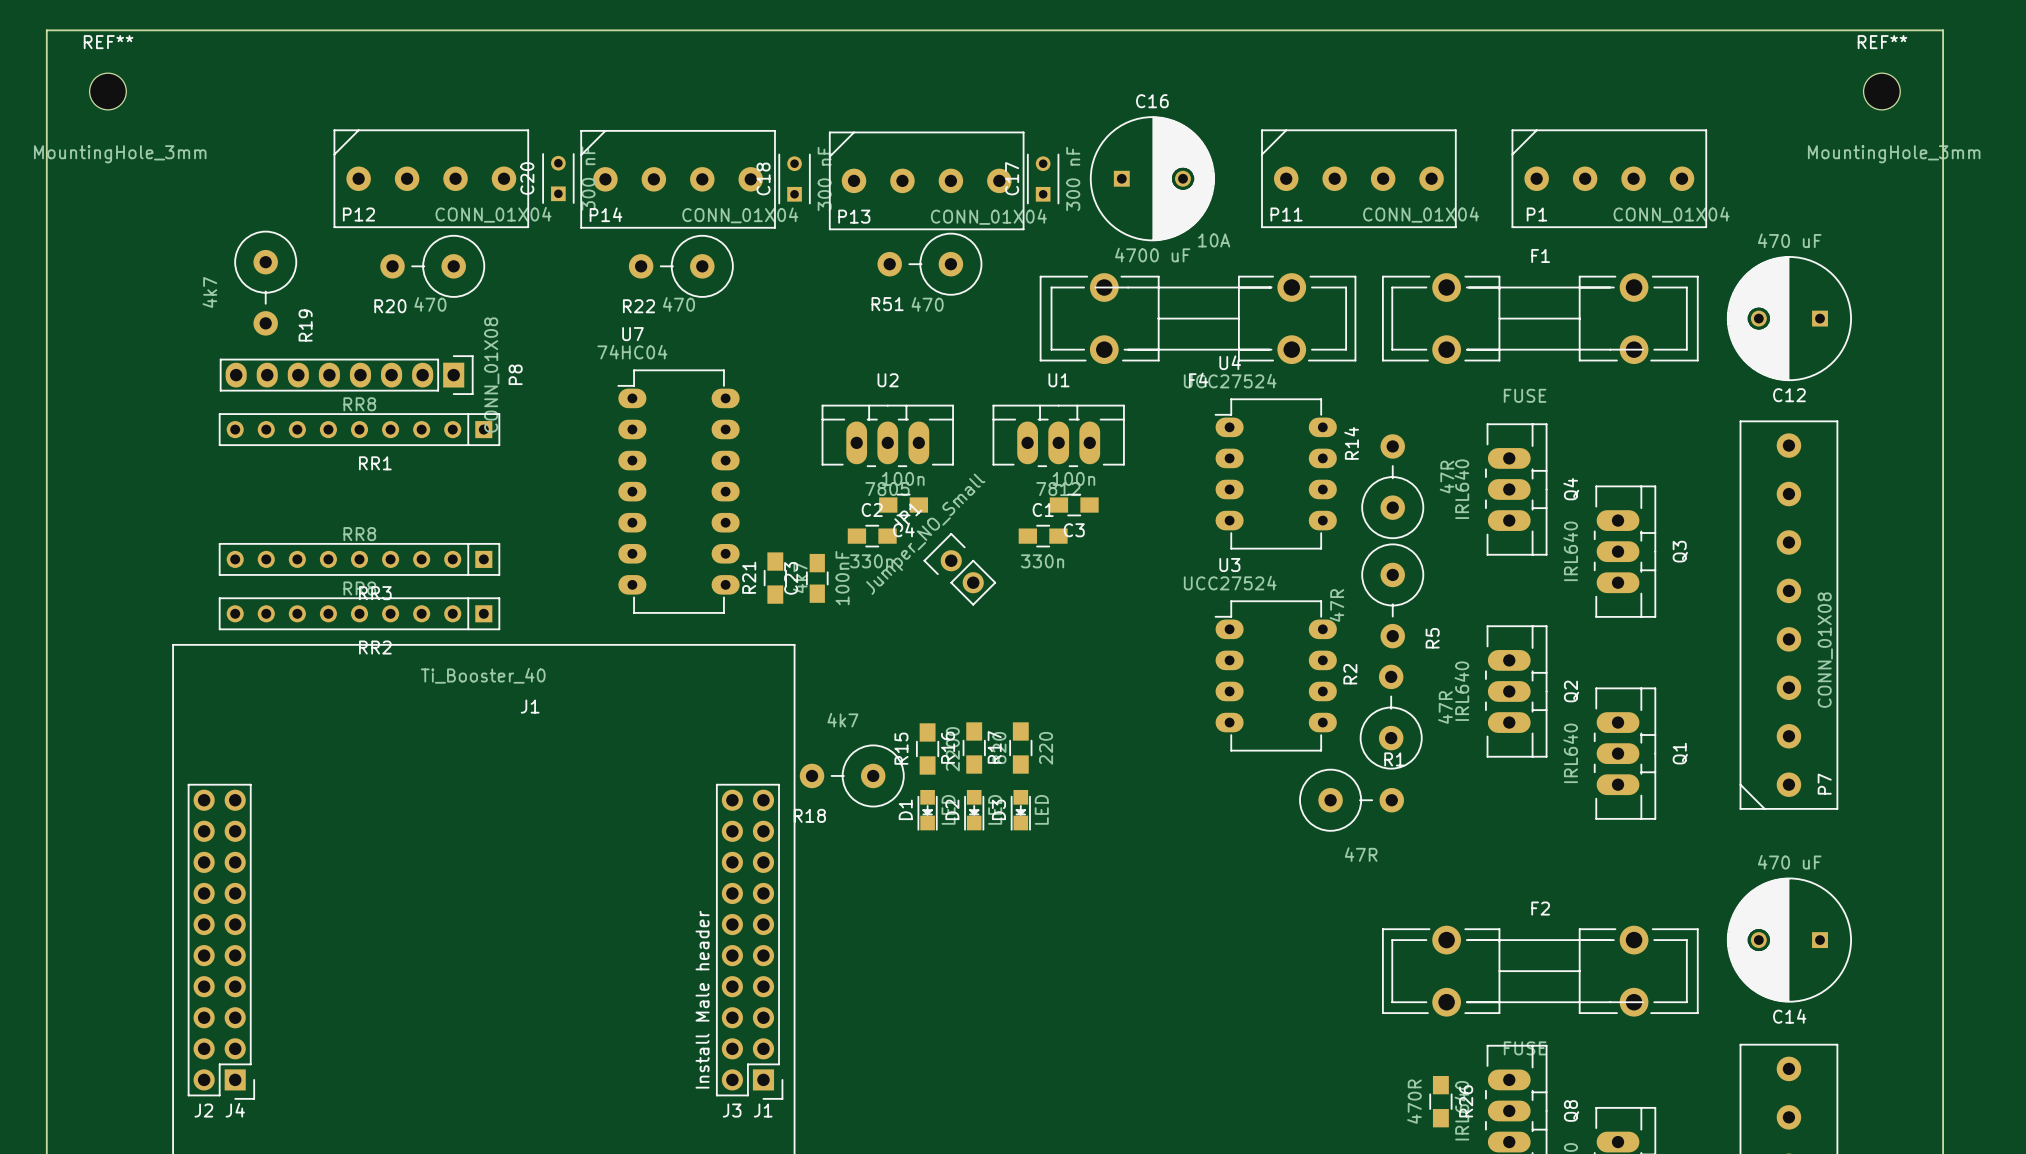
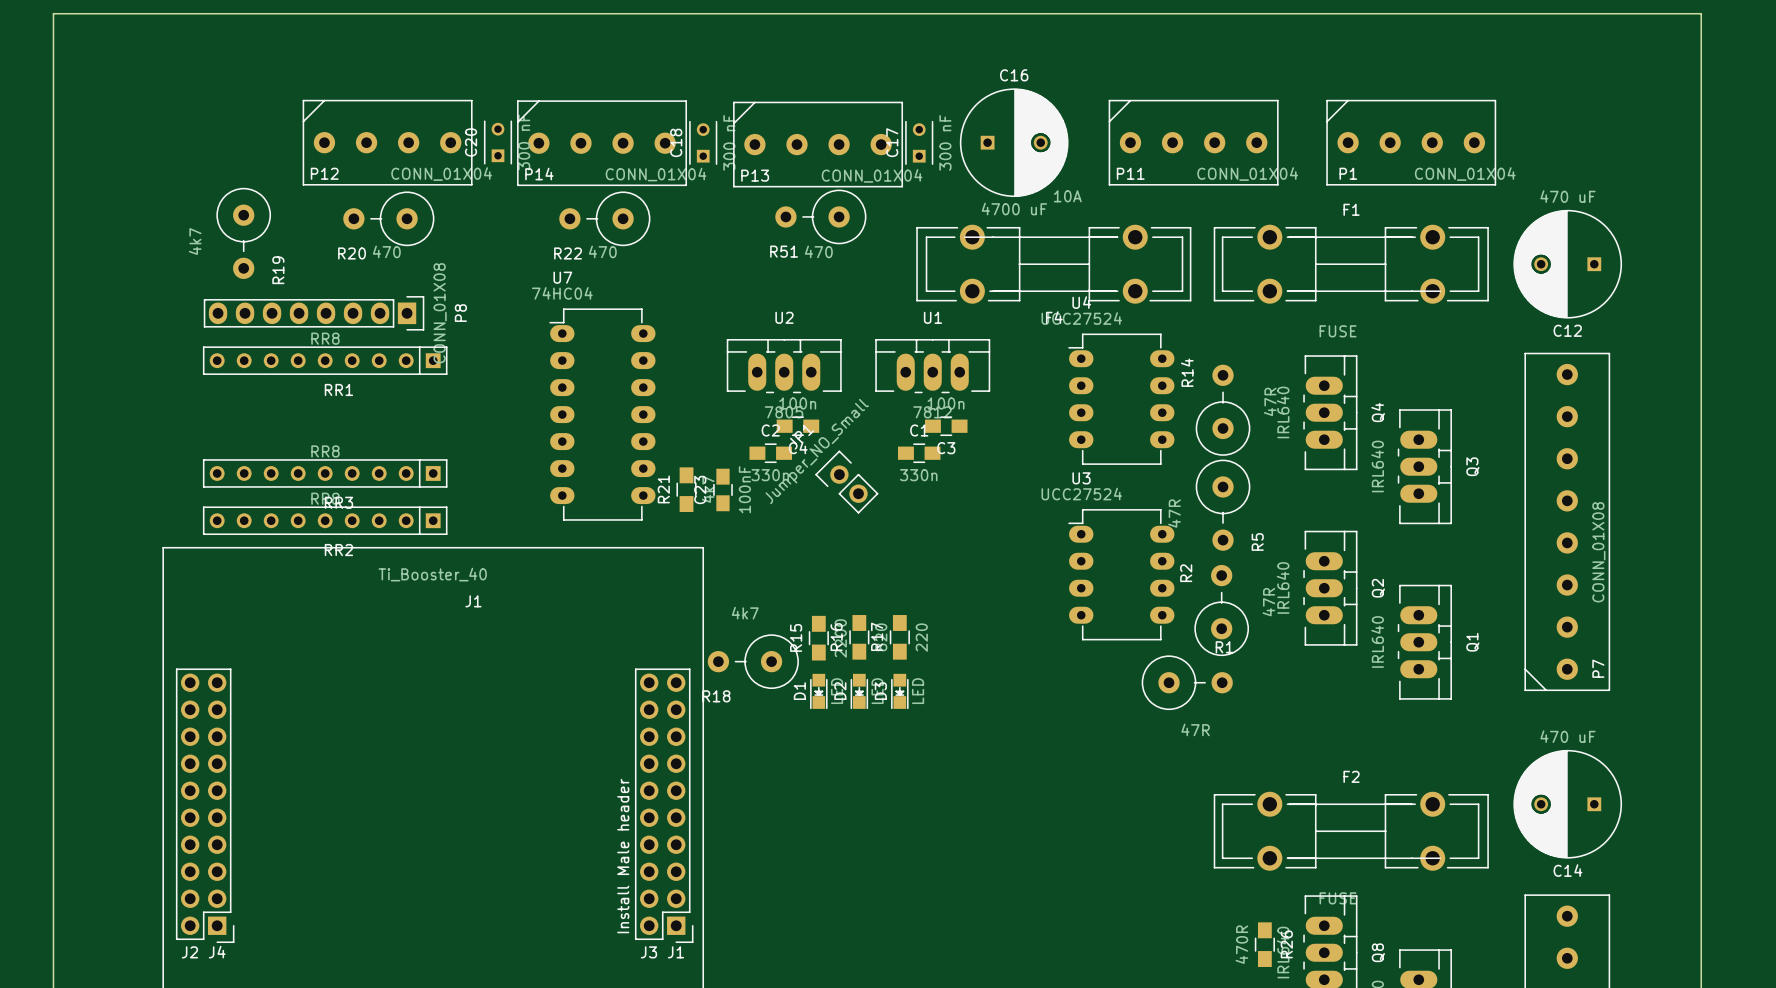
REF**: MountingHole_3mm (107, 91) -> none
REF**: MountingHole_3mm (1881, 91) -> none

